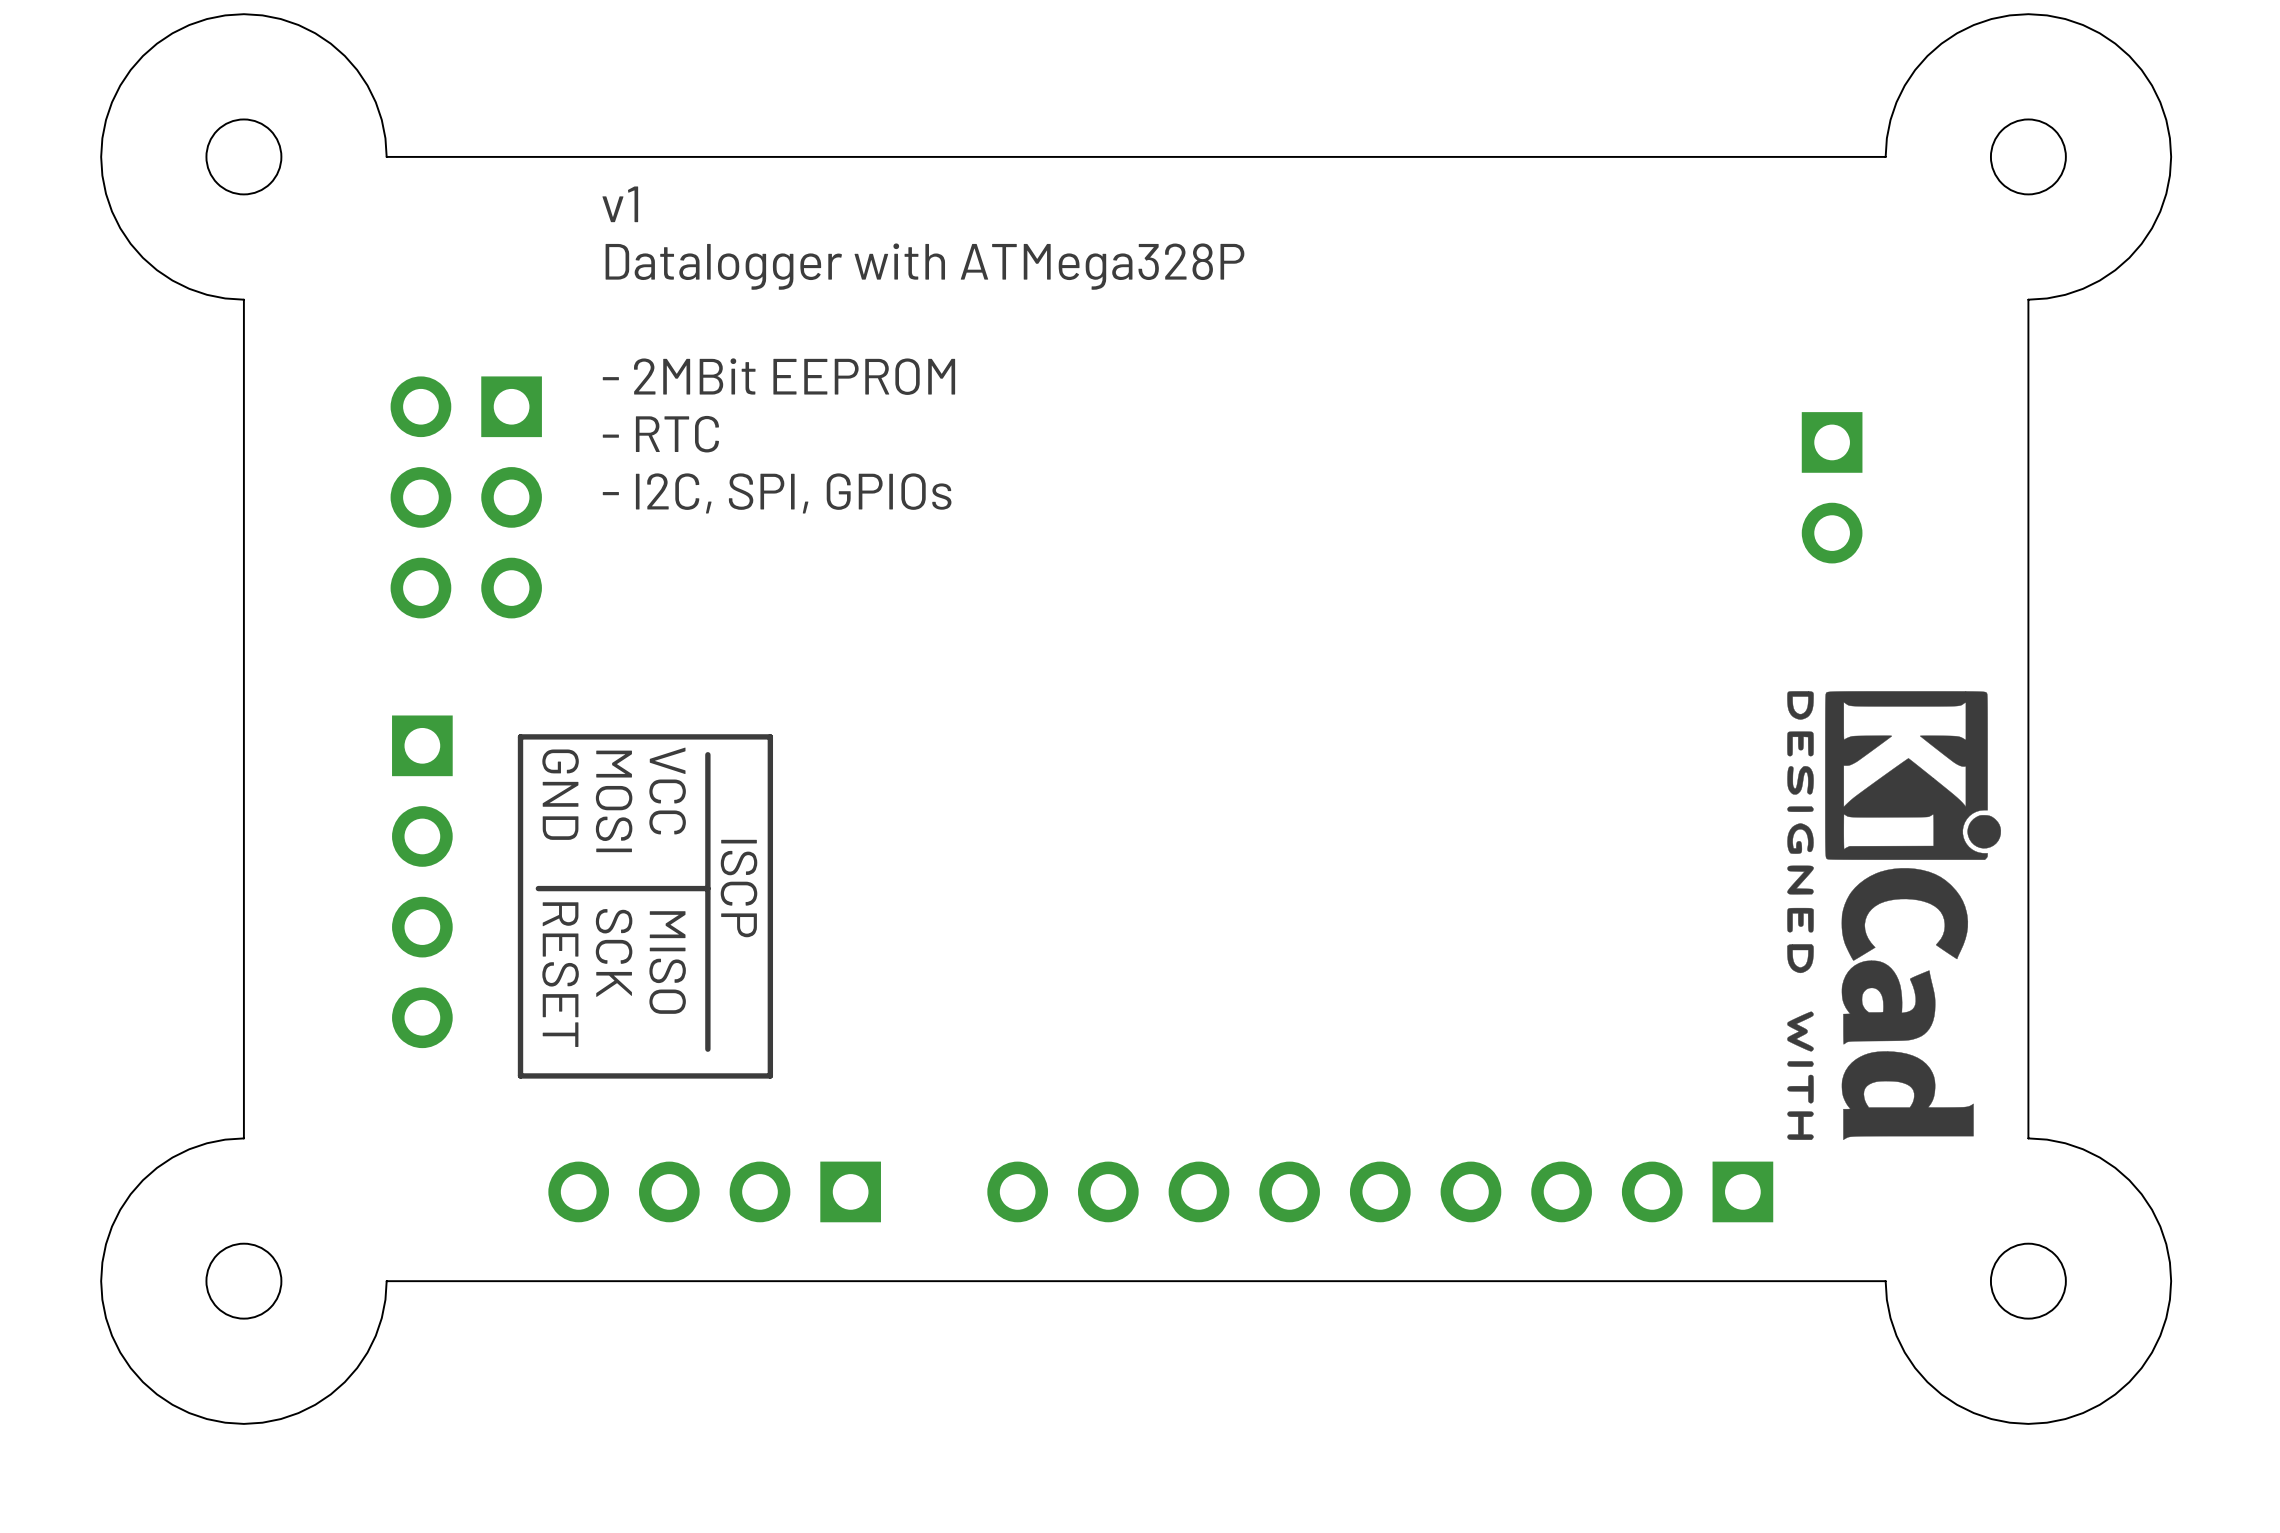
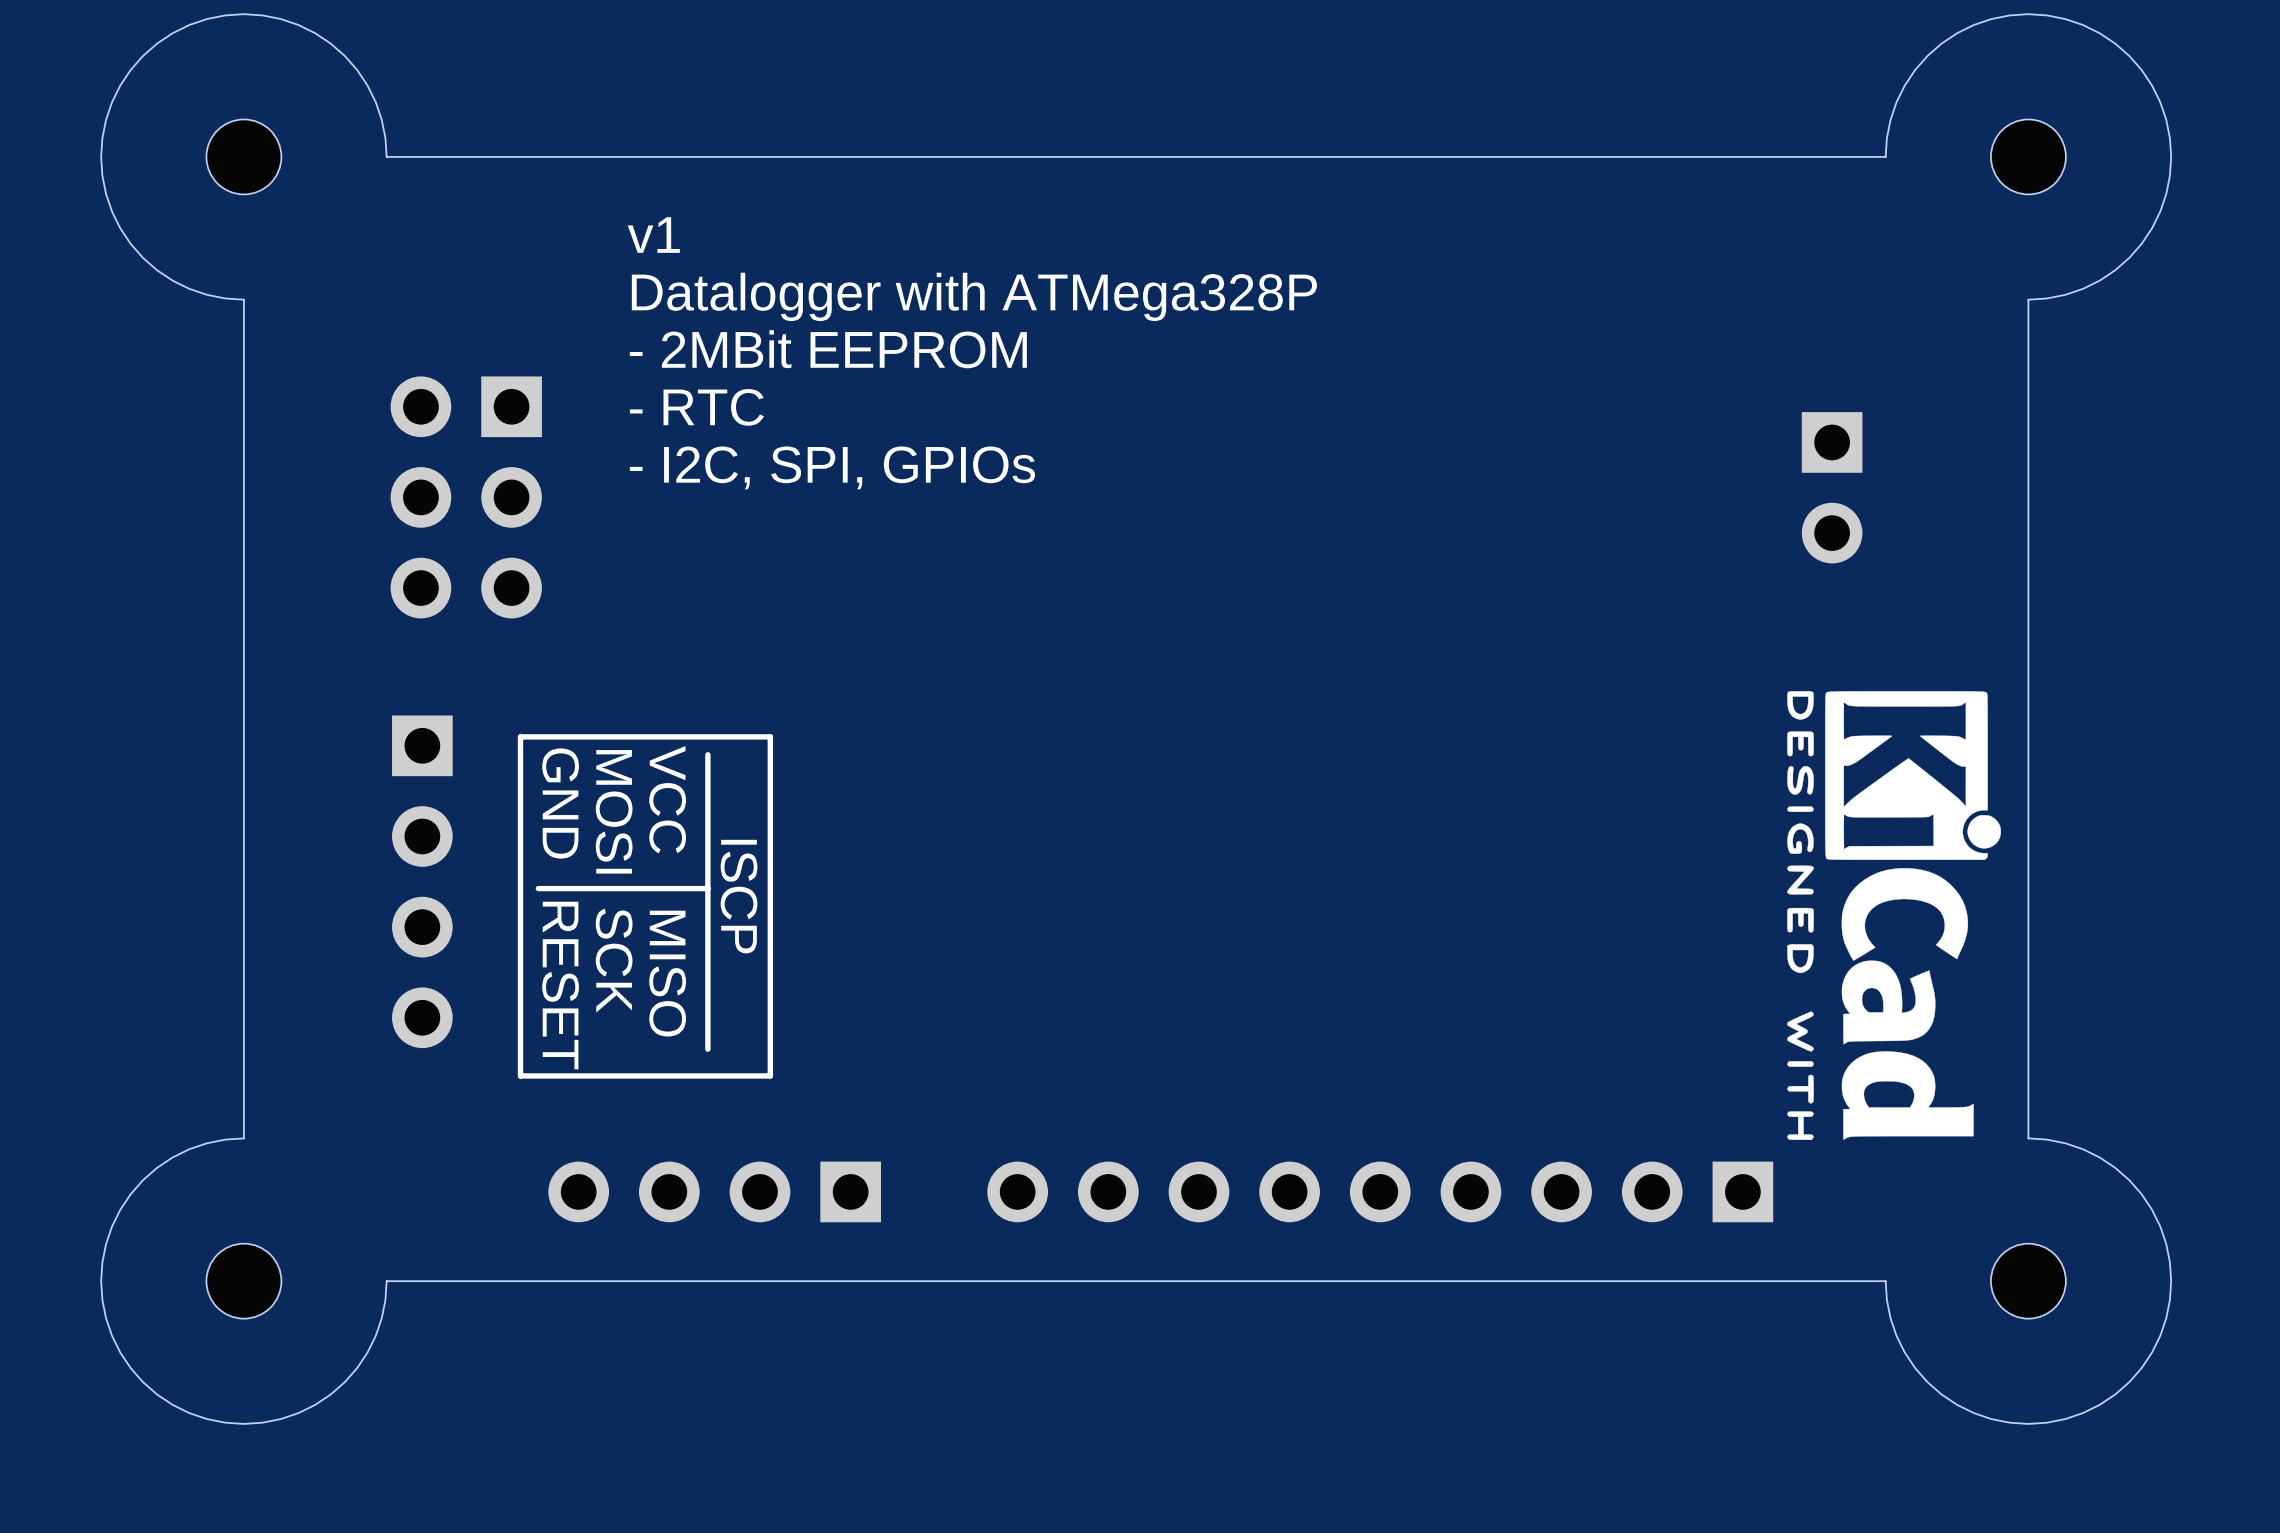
text position: v1 (620, 204) -> v1 (653, 235)
text position: Datalogger with ATMega328P (924, 266) -> Datalogger with ATMega328P (974, 296)
text position: - 2MBit EEPROM (778, 376) -> - 2MBit EEPROM (828, 349)
text position: - RTC (660, 434) -> - RTC (696, 407)
text position: - I2C, SPI, GPIOs (777, 493) -> - I2C, SPI, GPIOs (832, 467)

